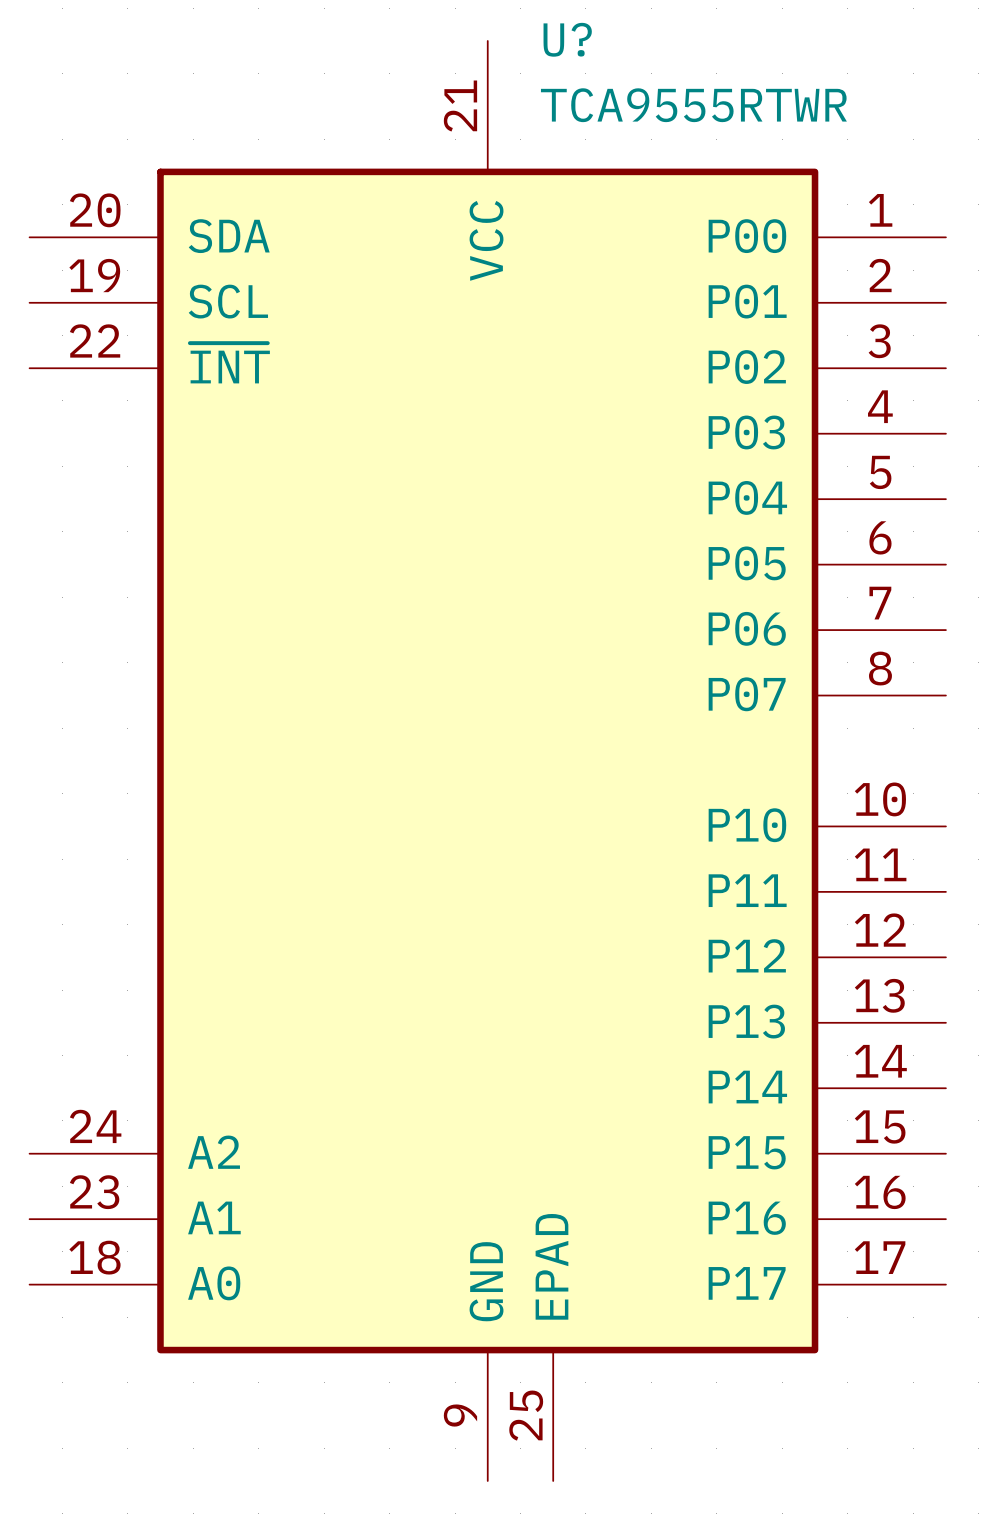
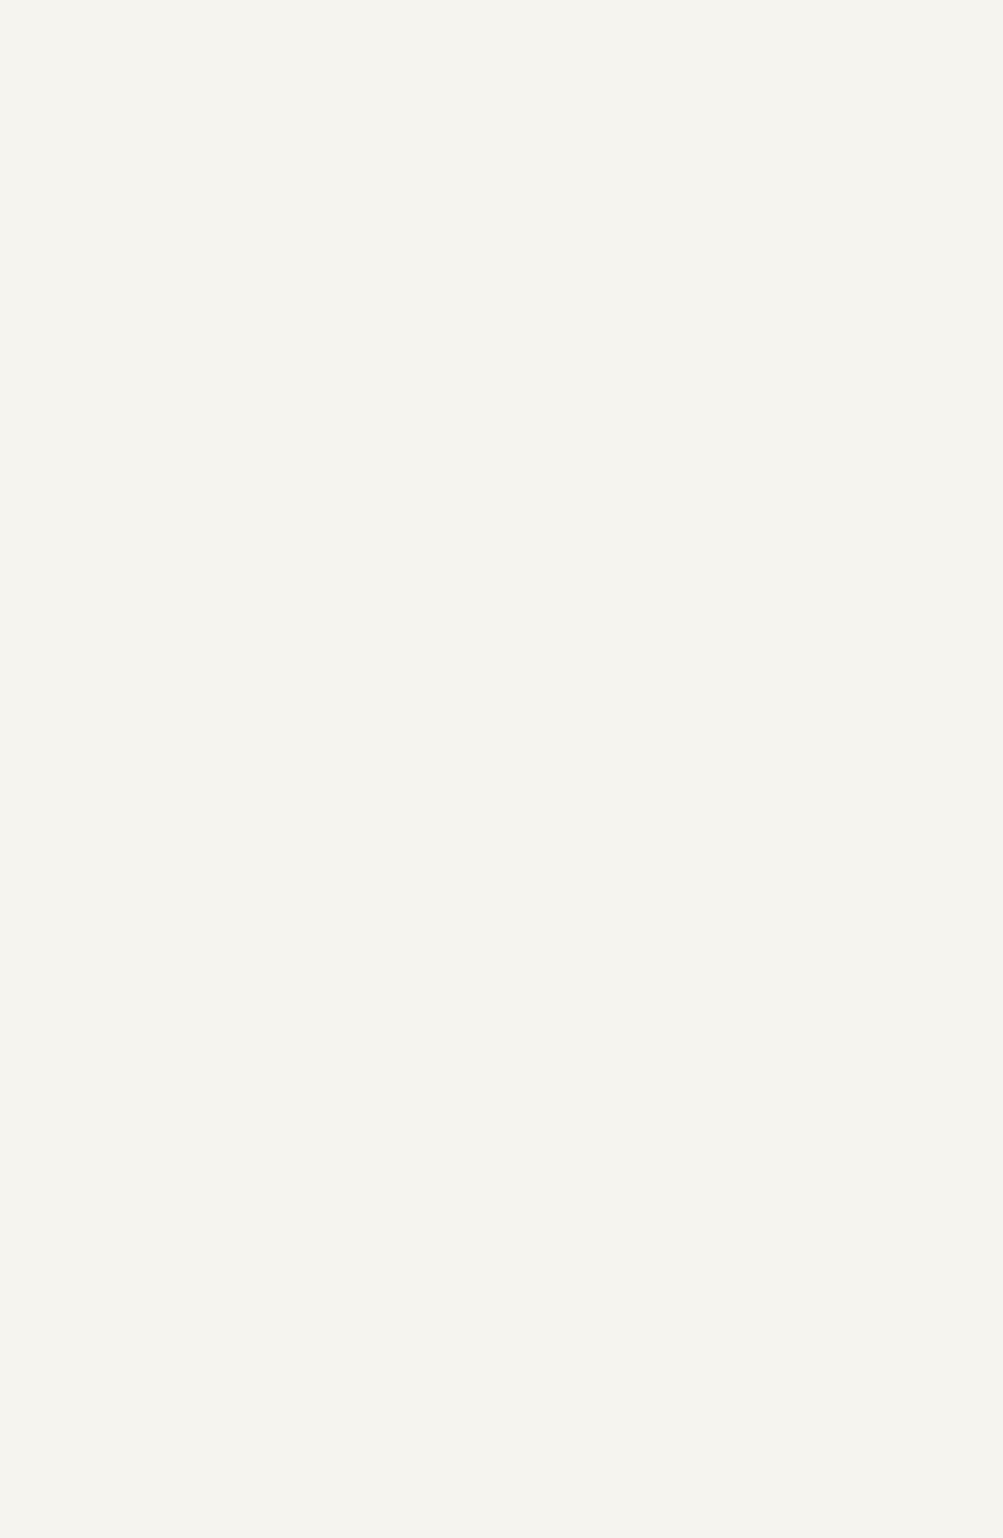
U?: TCA9555RTWR (487, 760) -> none

